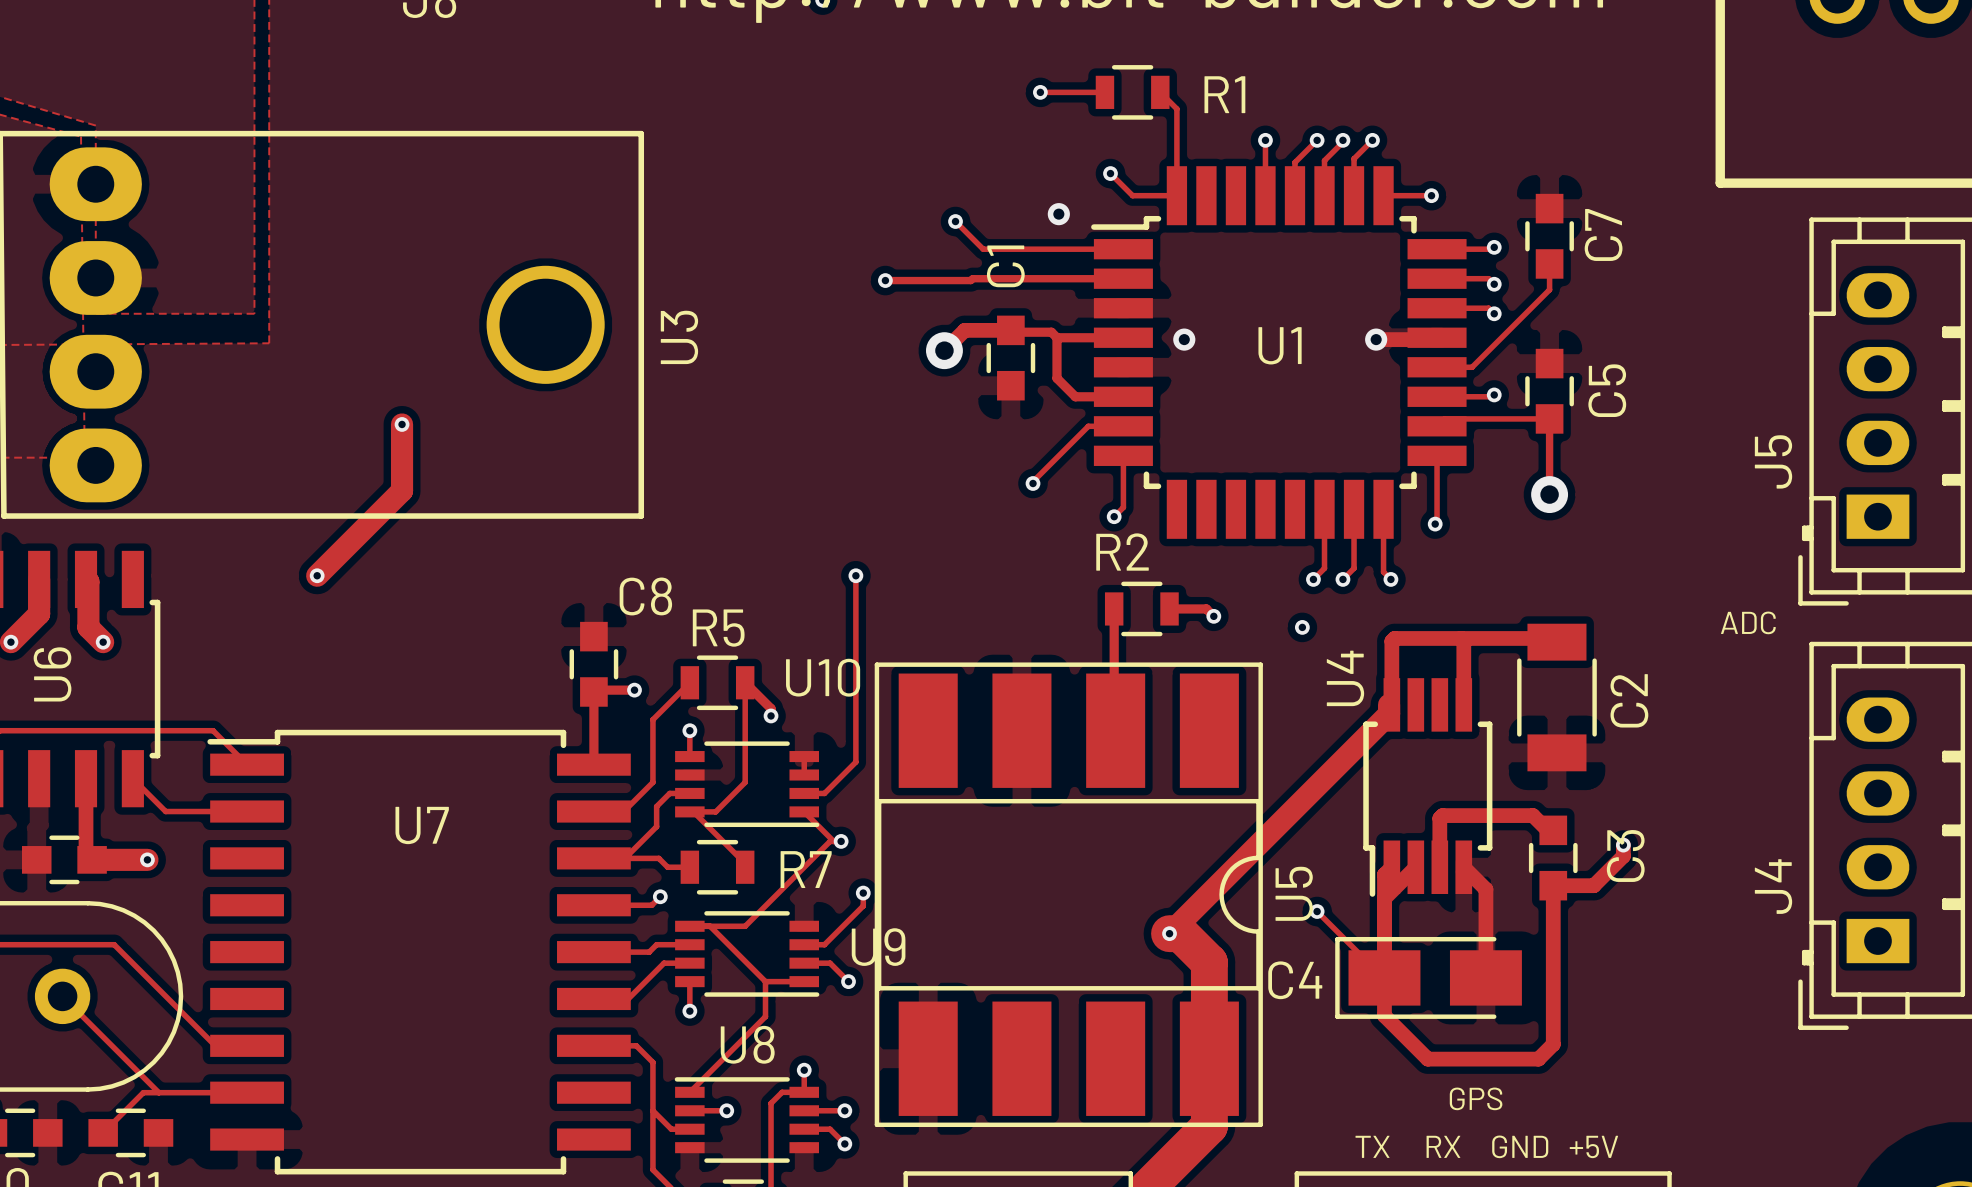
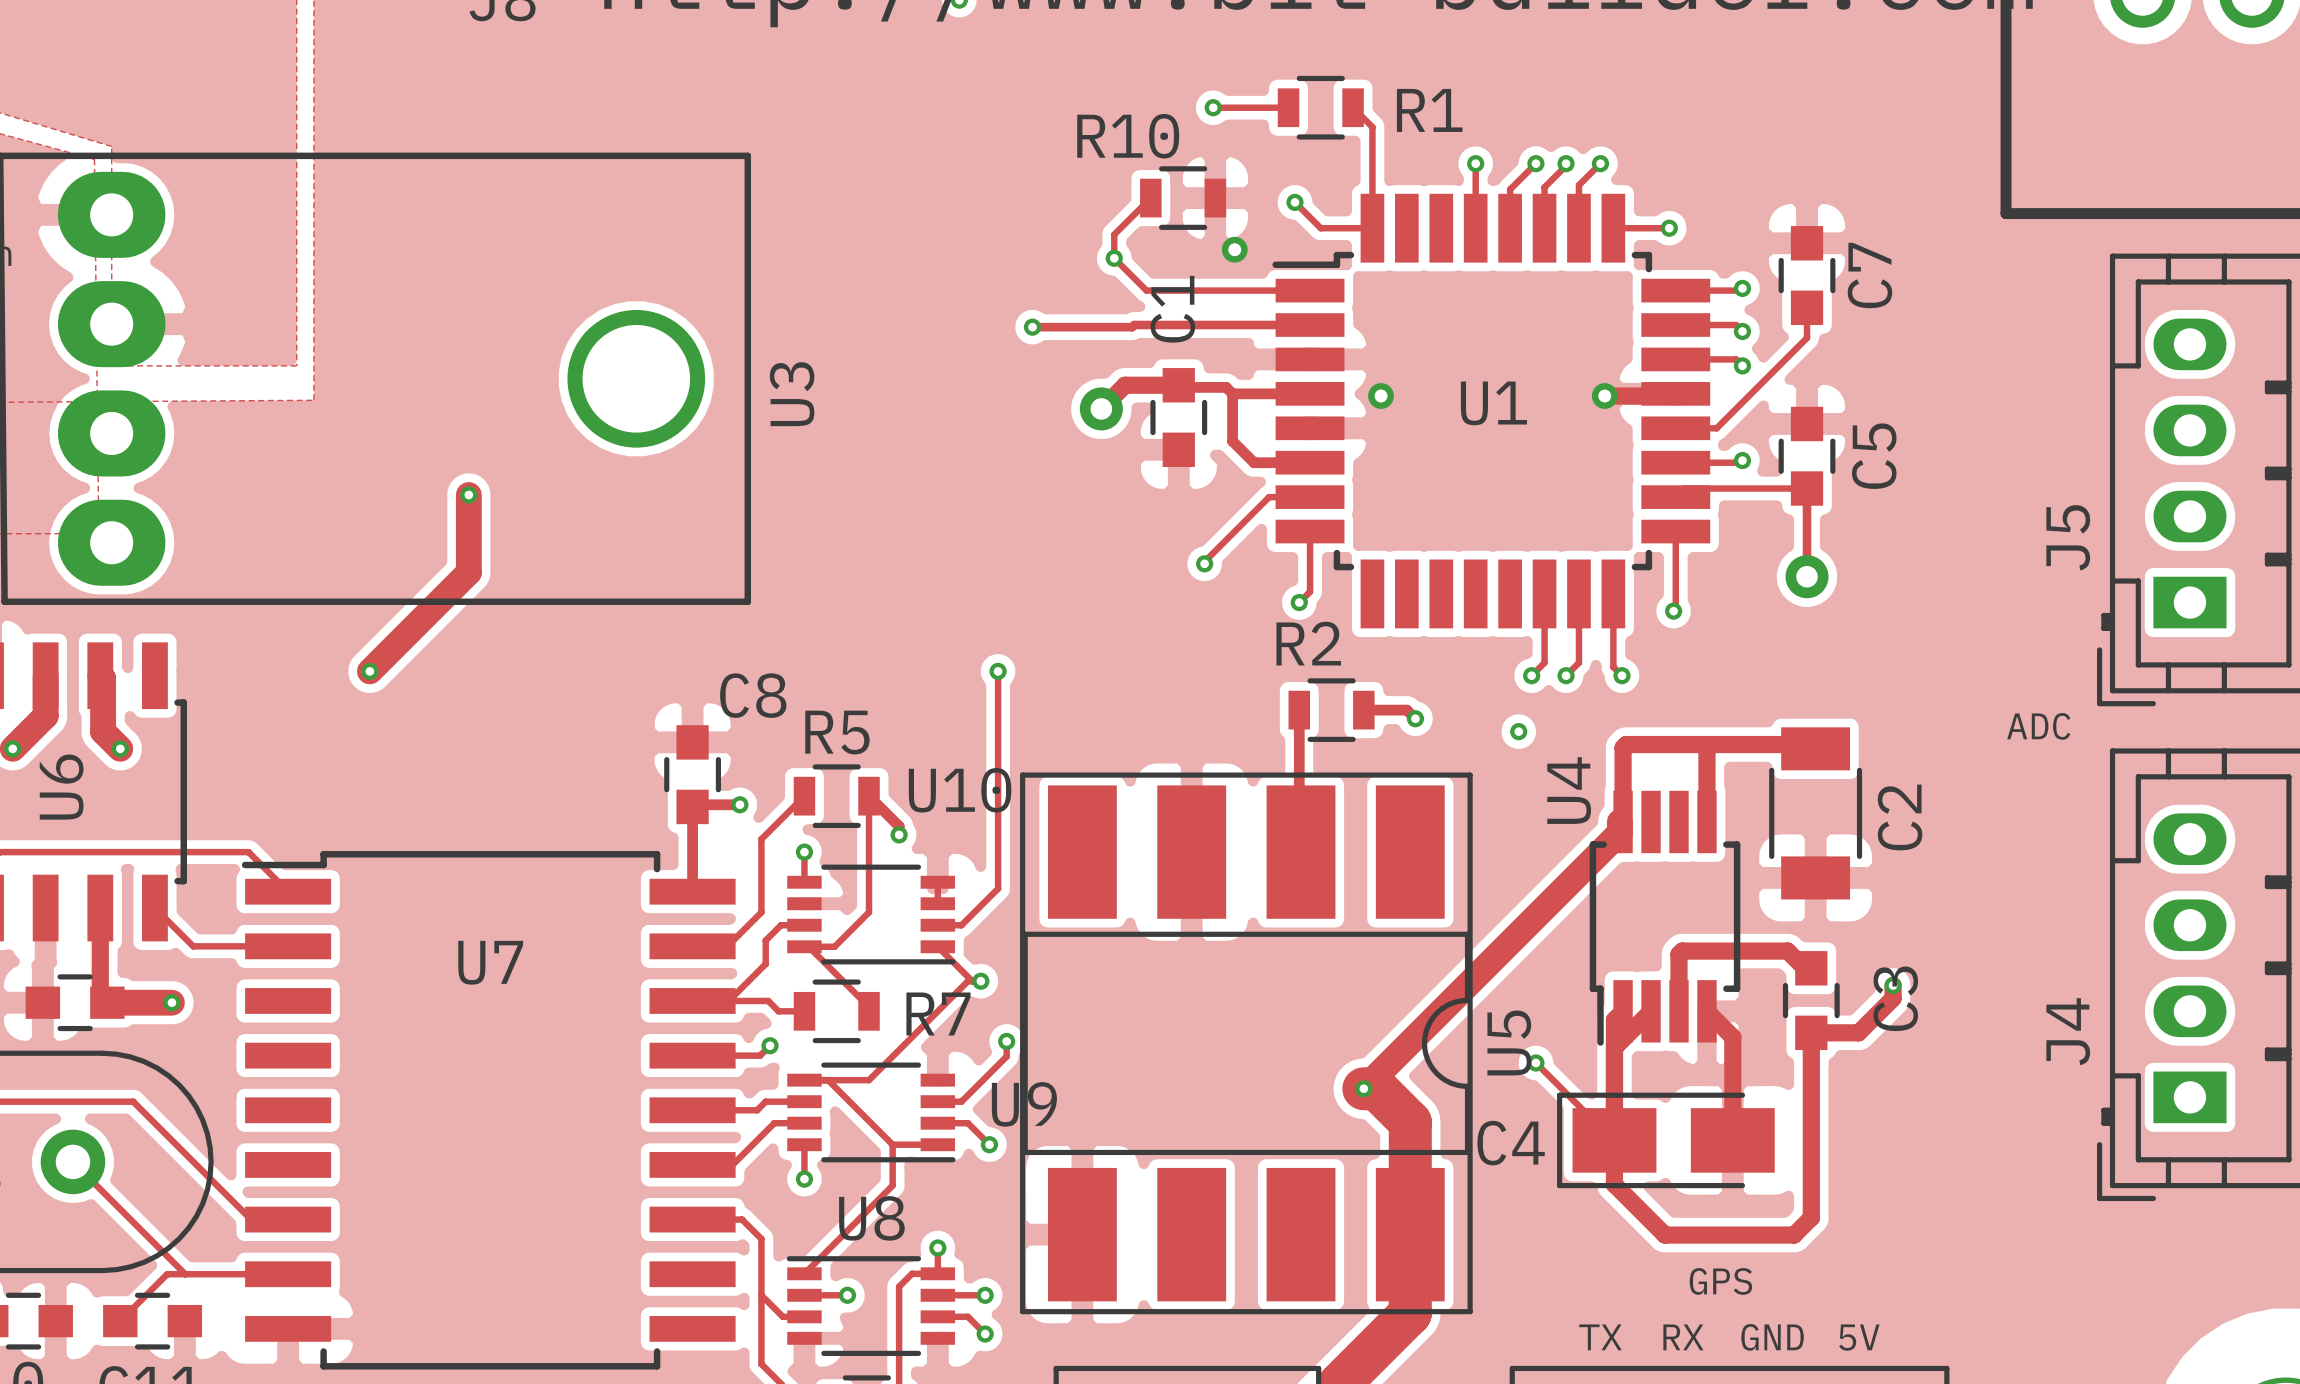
track: none -> (1150, 198) (1114, 234) (1114, 258)
R10: none -> (1183, 198)
text: +5V (1593, 1146) -> 5V (1859, 1337)

